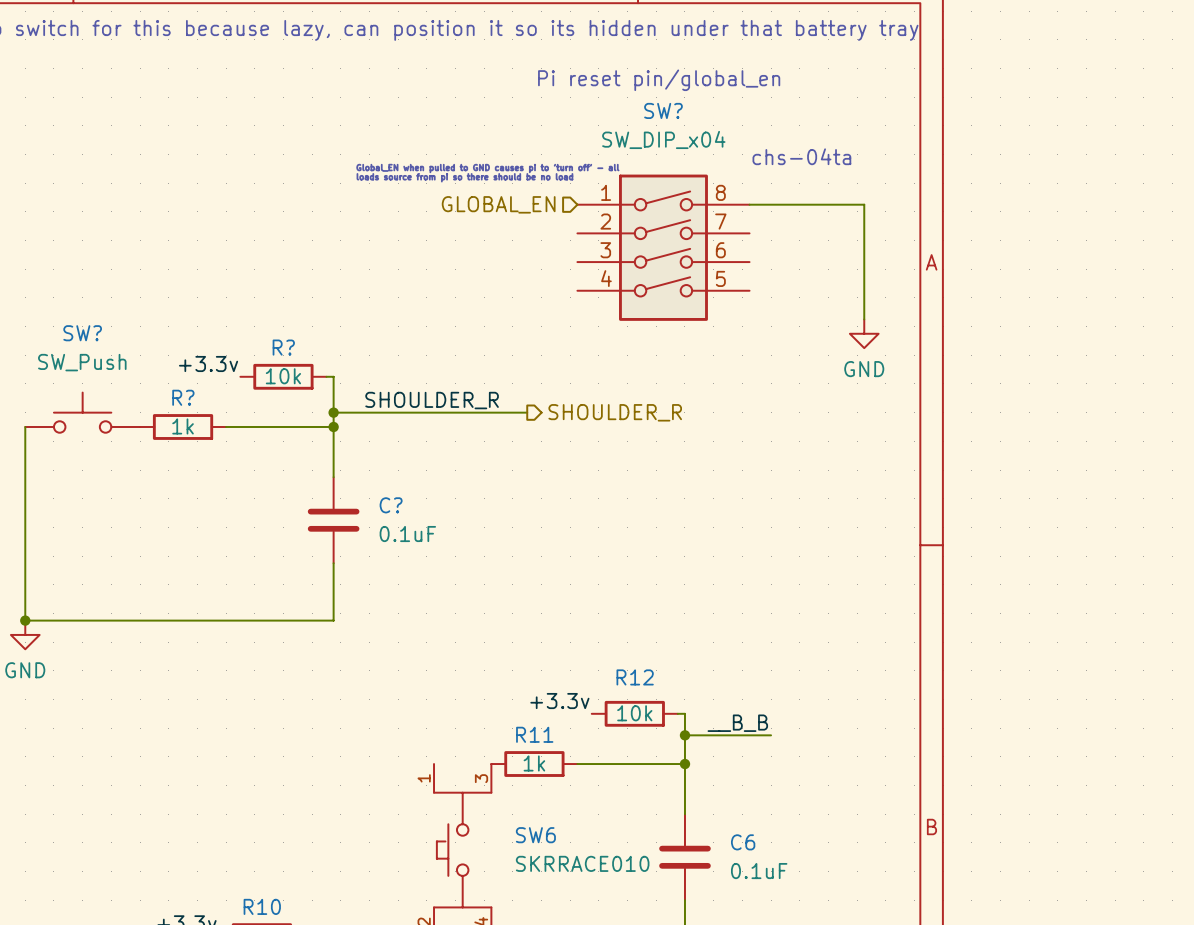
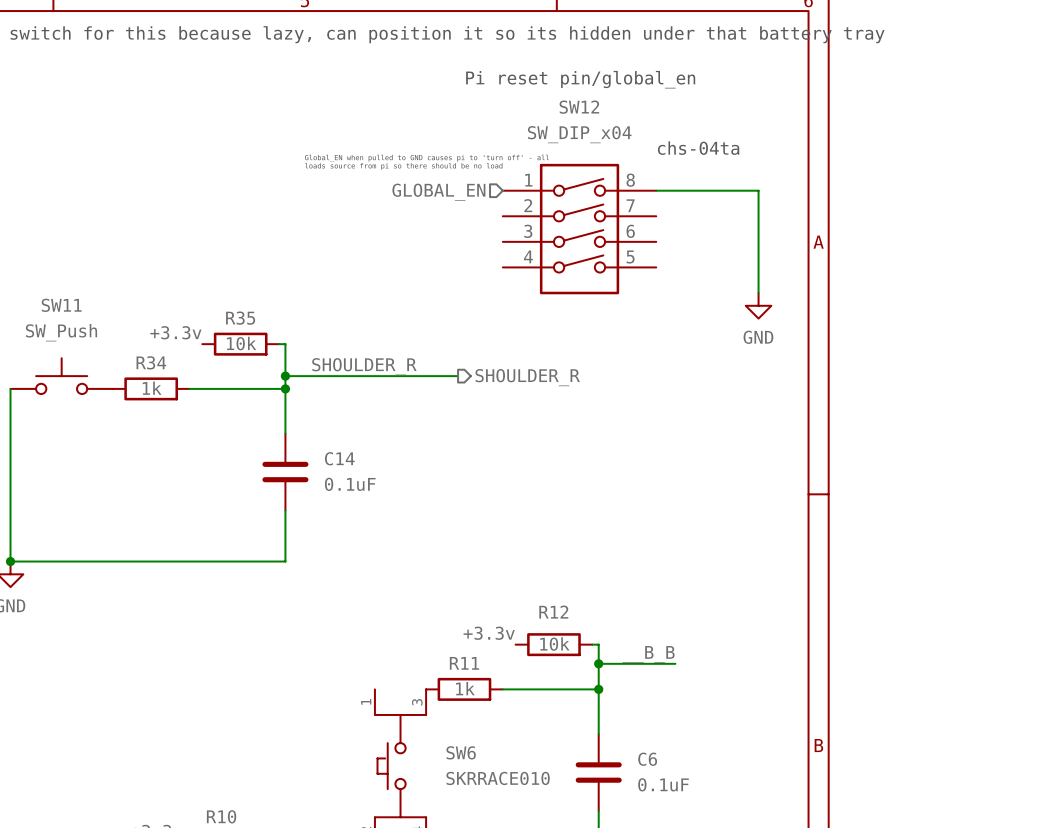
SW? name: SW? (663, 110) -> SW12 (579, 107)
SW? name: SW? (82, 333) -> SW11 (61, 305)
R? name: R? (283, 347) -> R35 (240, 318)
R? name: R? (183, 397) -> R34 (151, 362)
C? name: C? (391, 505) -> C14 (339, 458)

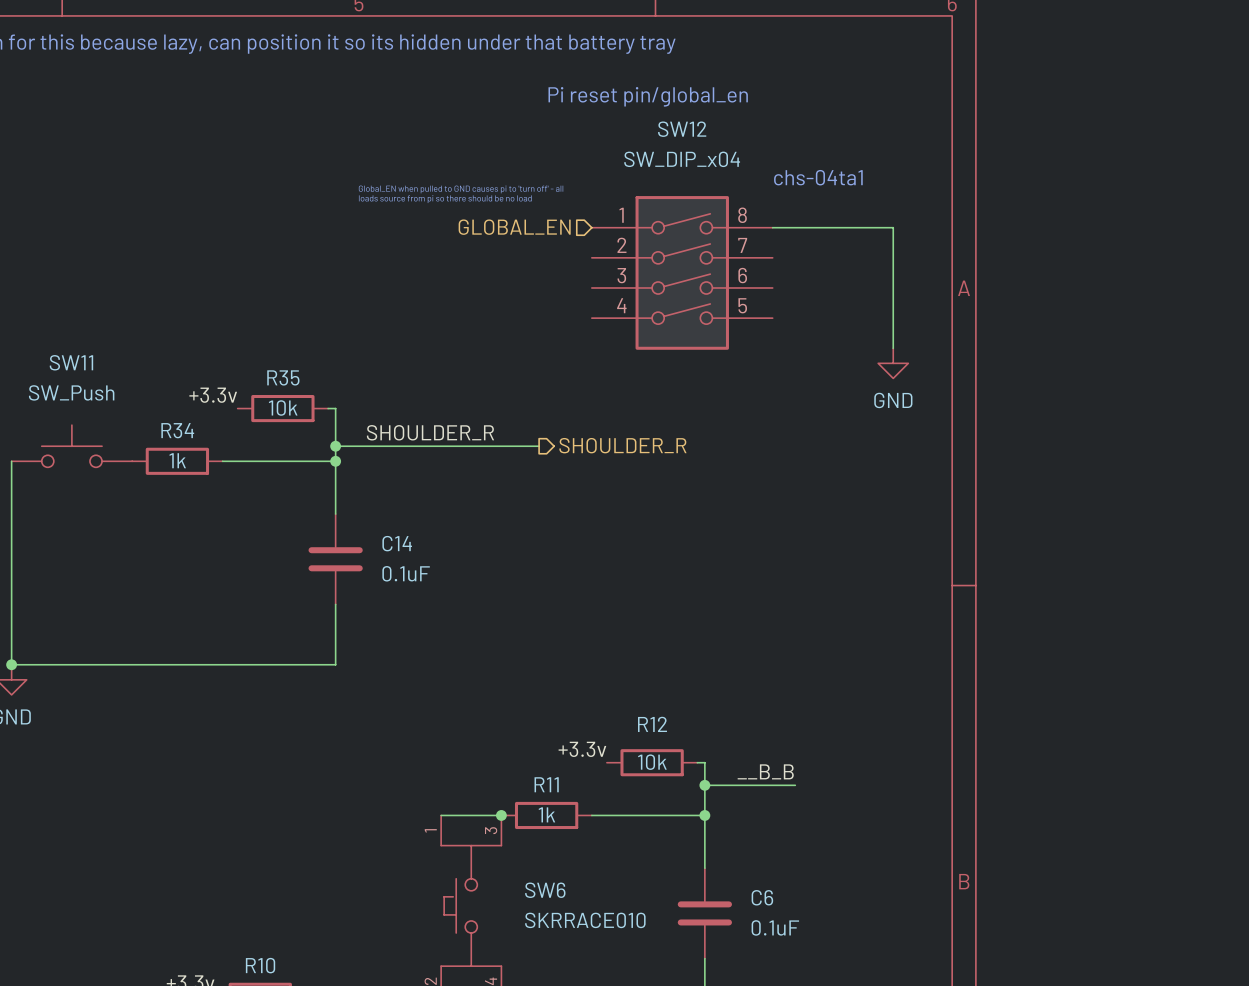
text: chs-04ta (698, 148) -> chs-04ta1 (818, 177)
wire: none -> (441, 815) (501, 815)
junction: none -> (501, 815)

